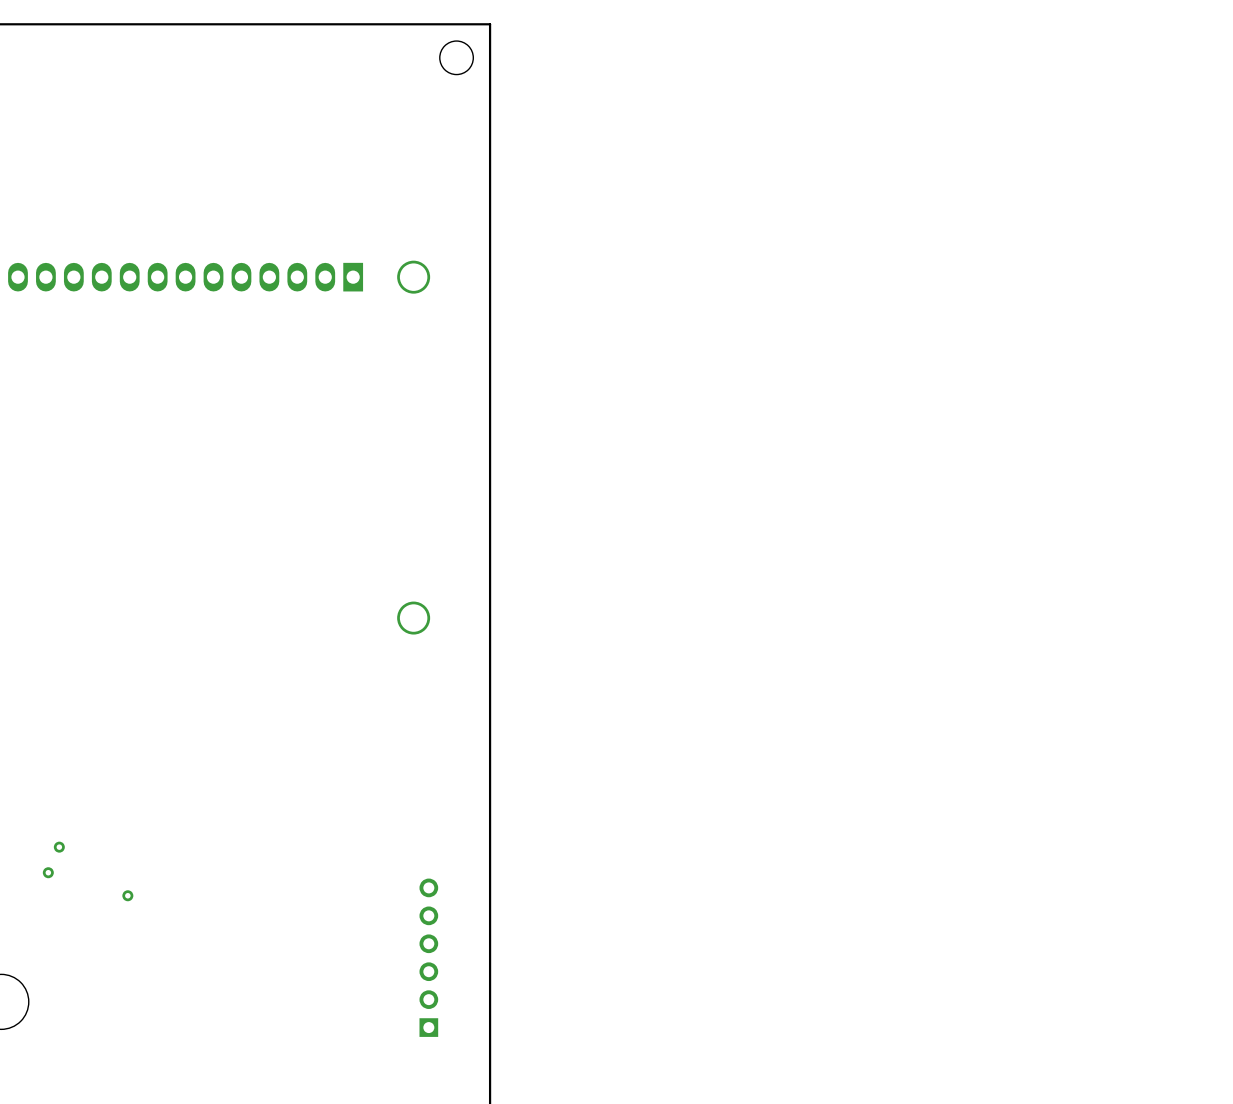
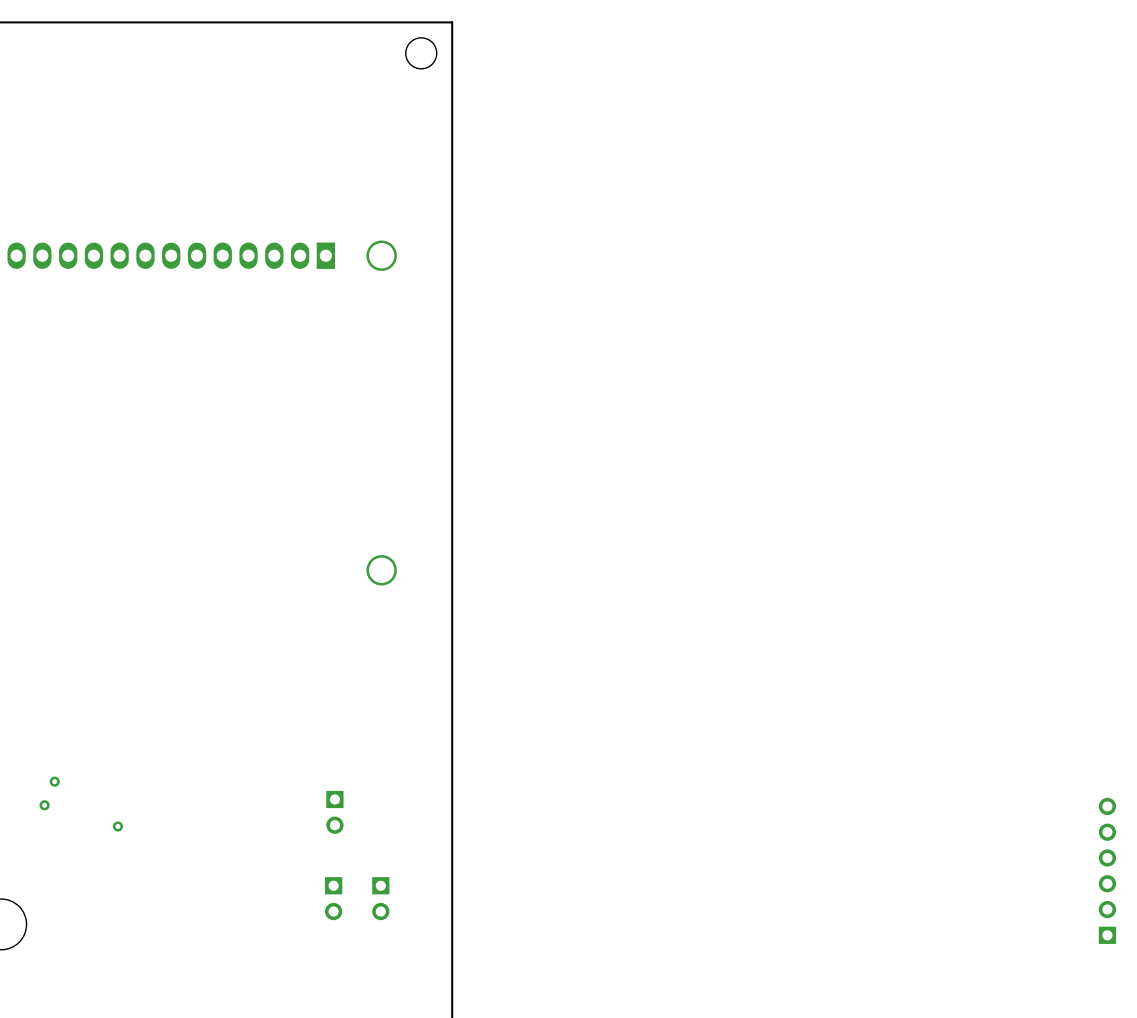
part: none -> (334, 812)
part: none -> (1107, 870)
part: (428, 957) -> none
part: none -> (333, 898)
part: none -> (380, 898)

